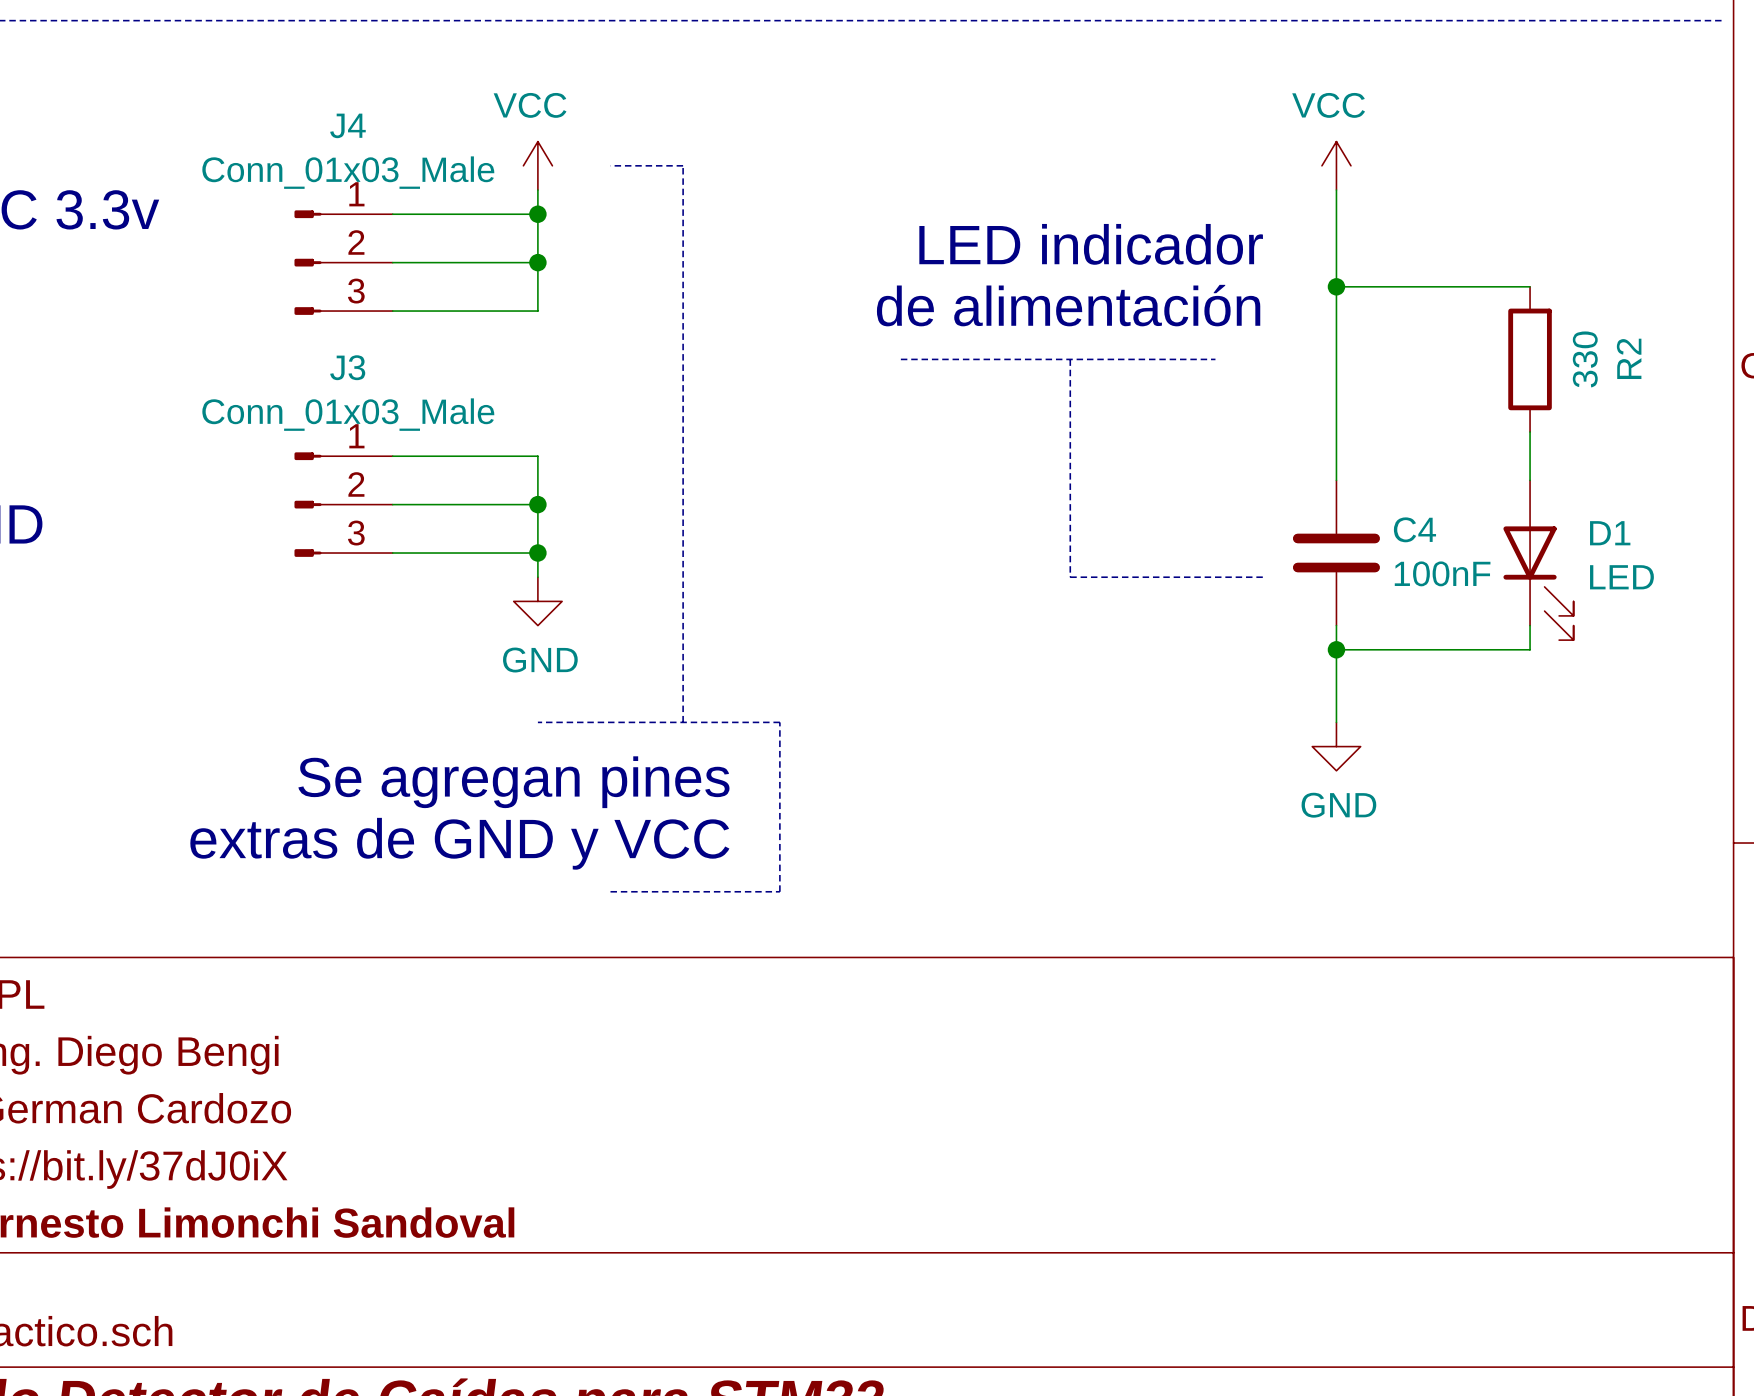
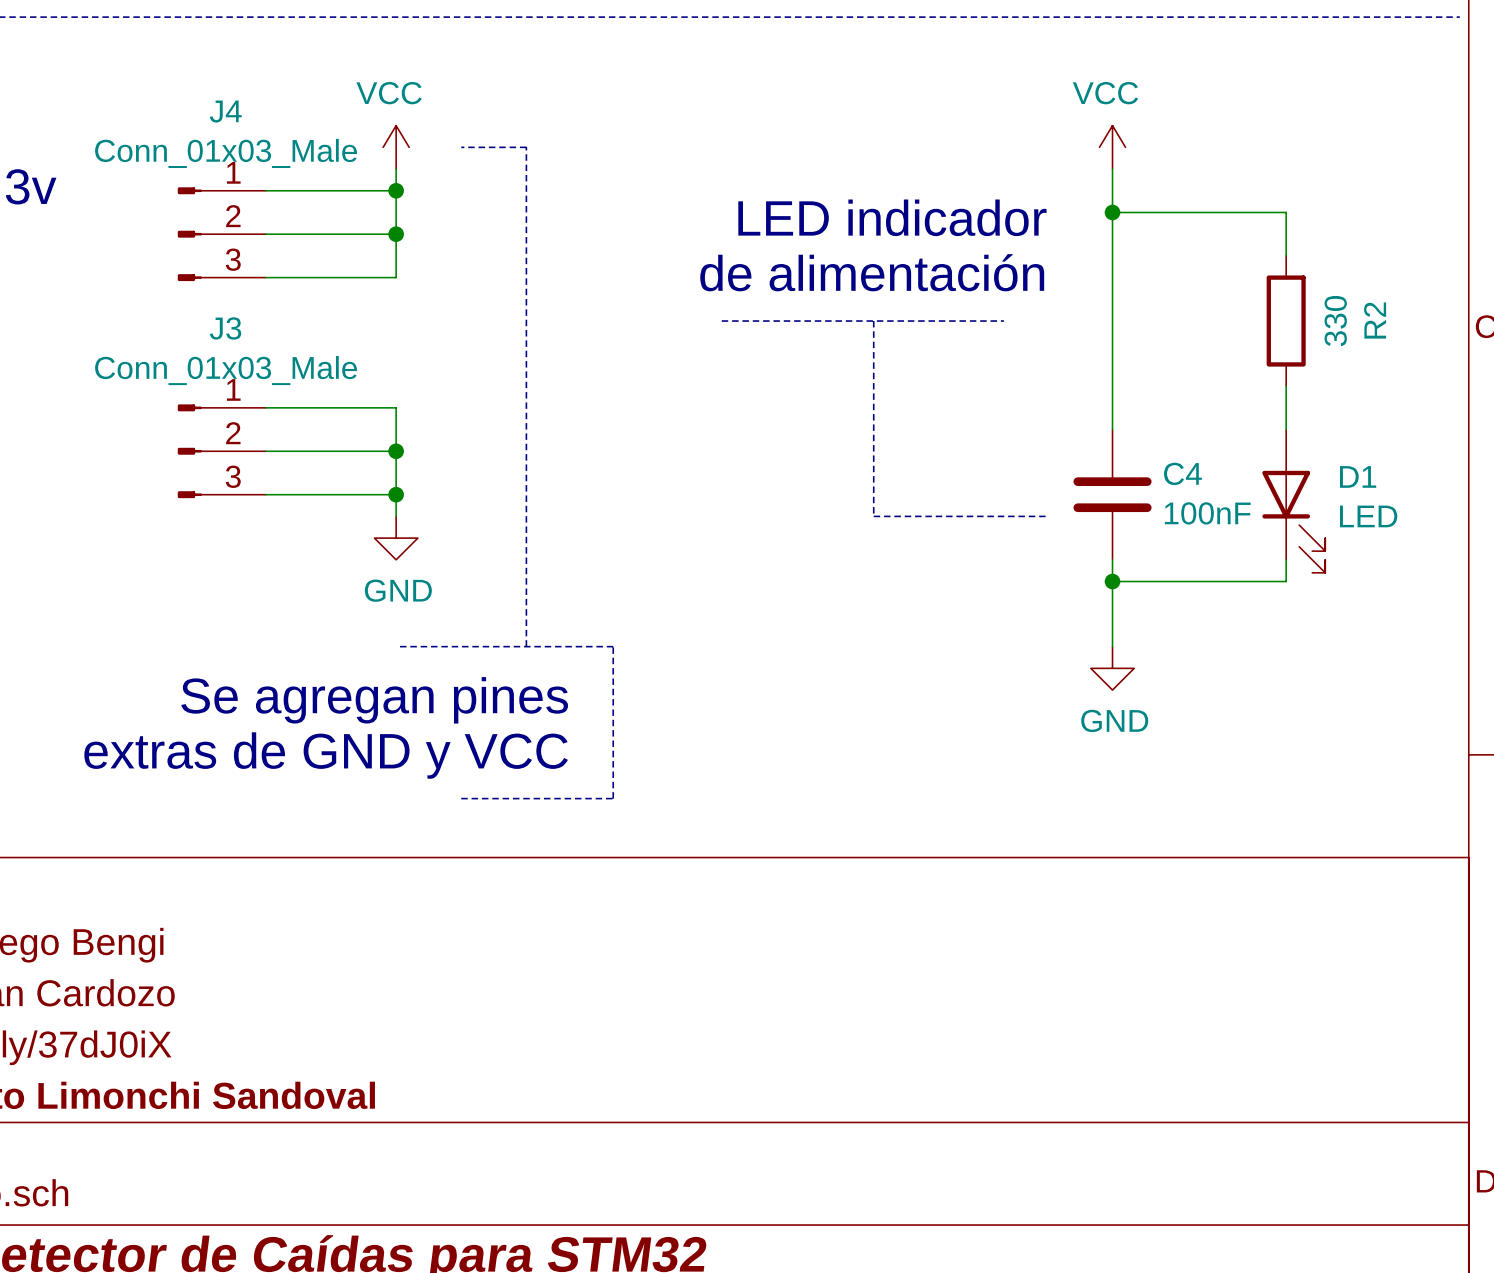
wire: (1336, 286) (1530, 286) -> (1112, 212) (1286, 212) (1286, 255)
junction position: (1336, 286) -> (1112, 212)

